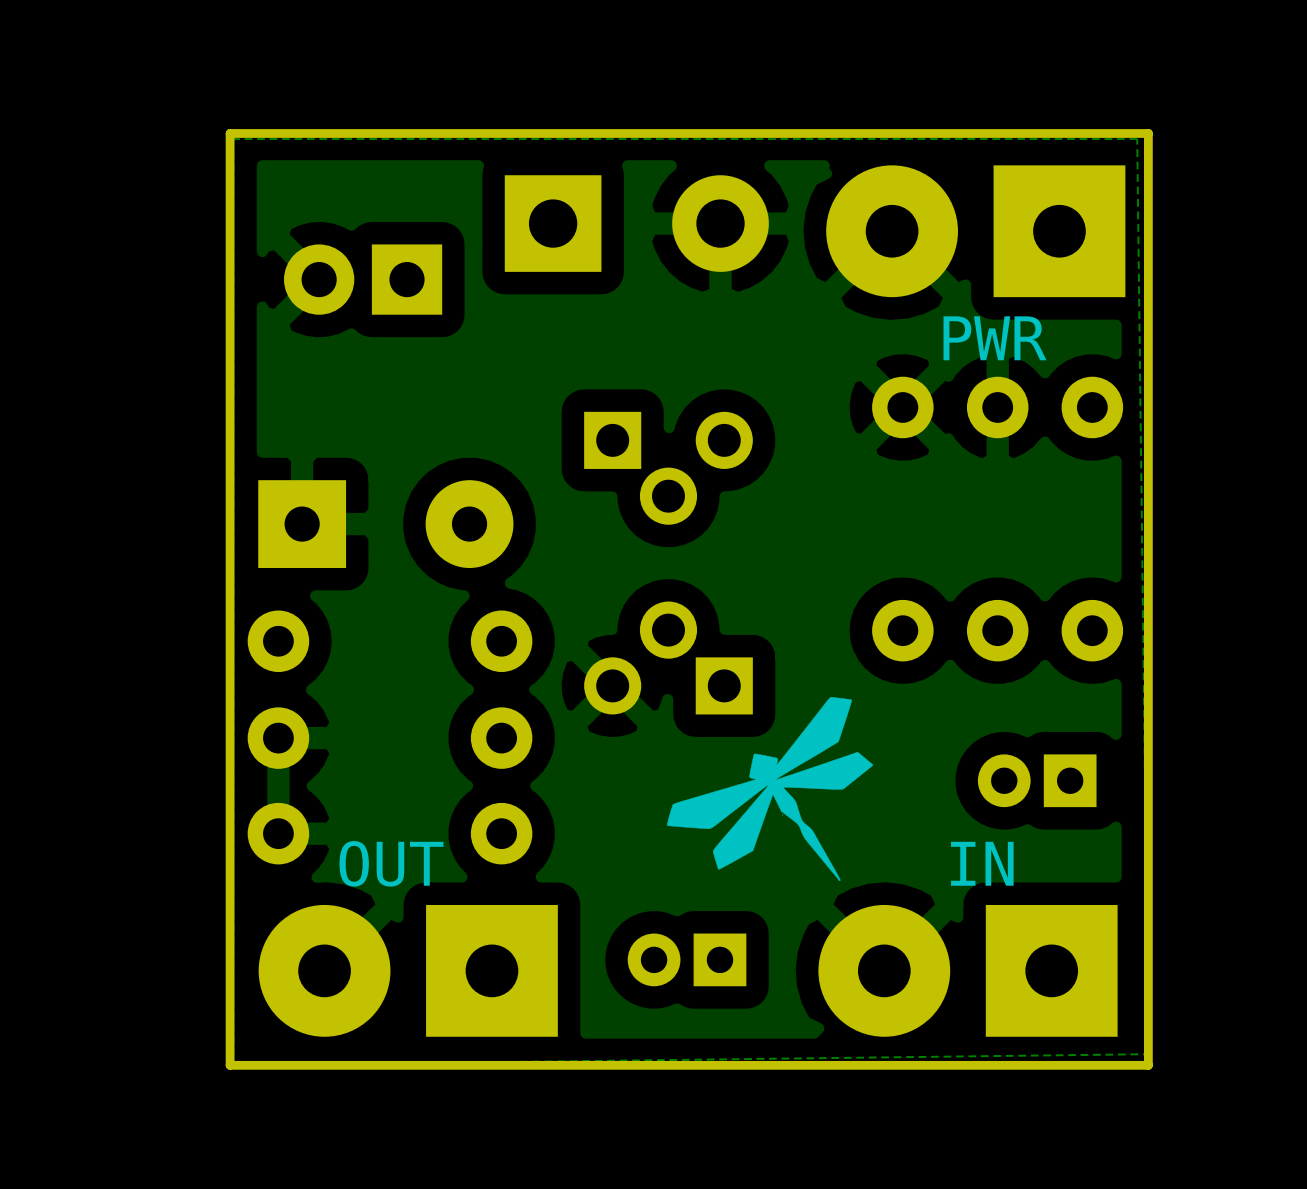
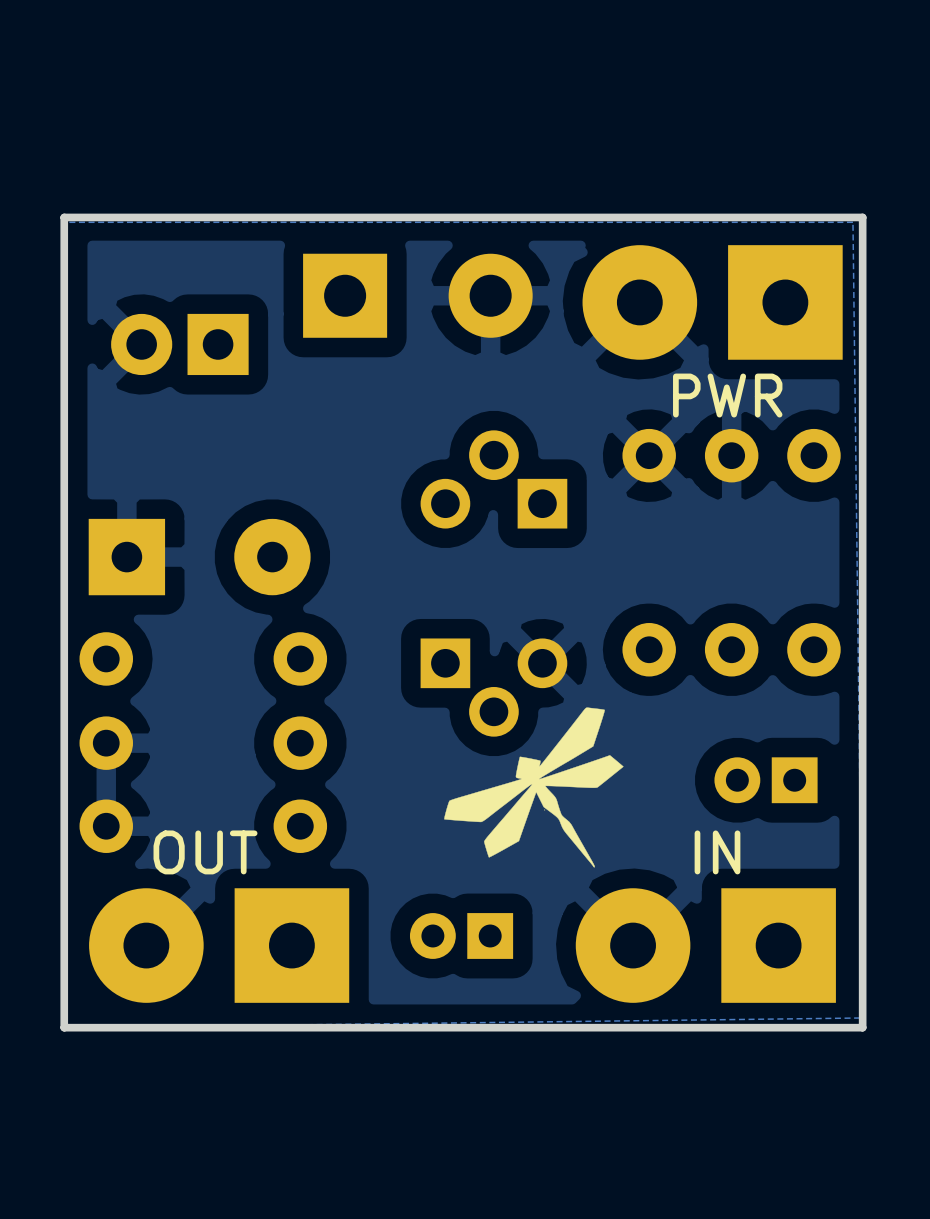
part rotation: 0° (668, 468) -> 180° (493, 479)
part rotation: 0° (668, 658) -> 180° (493, 687)

